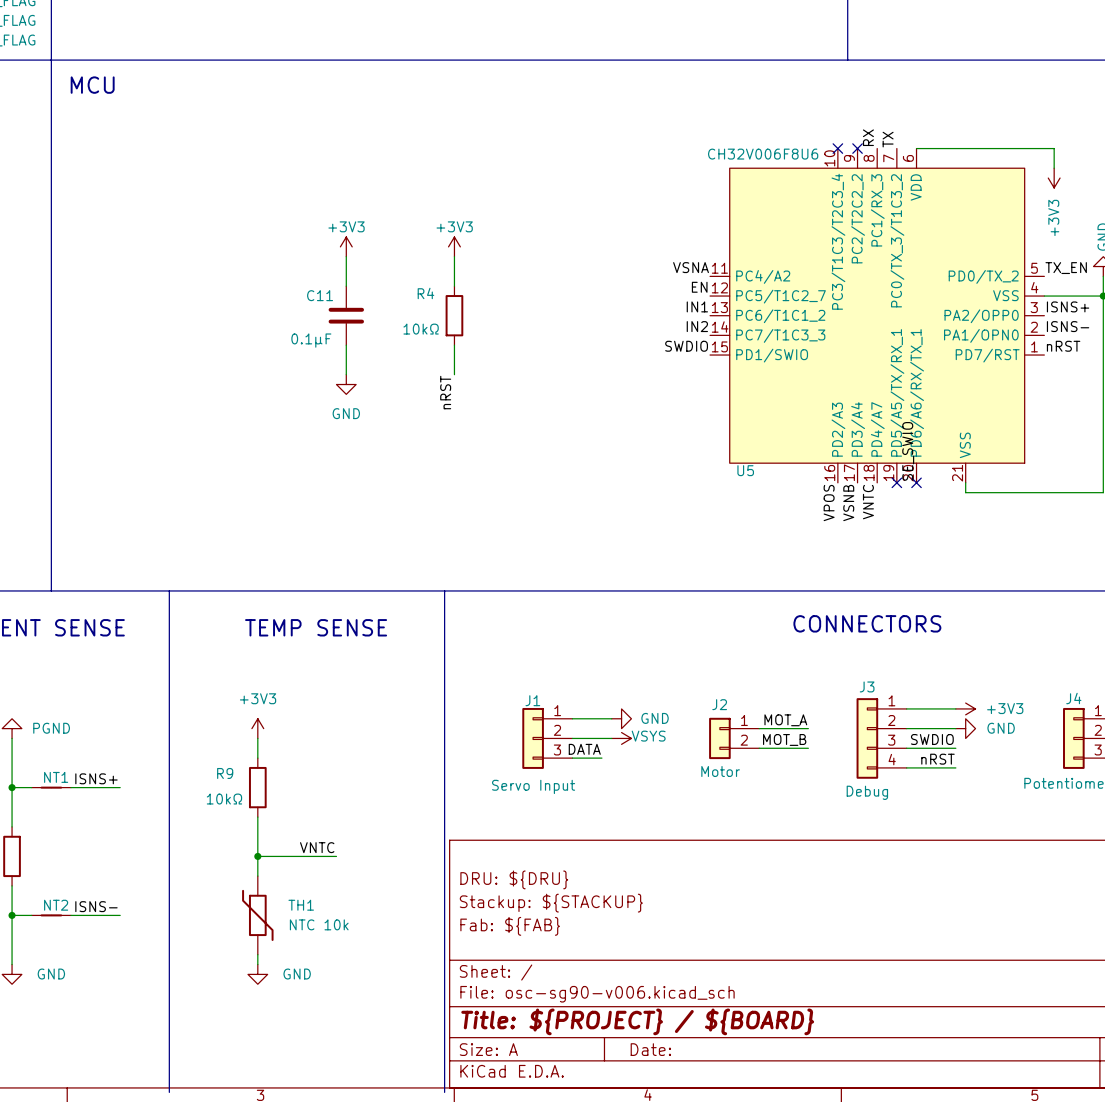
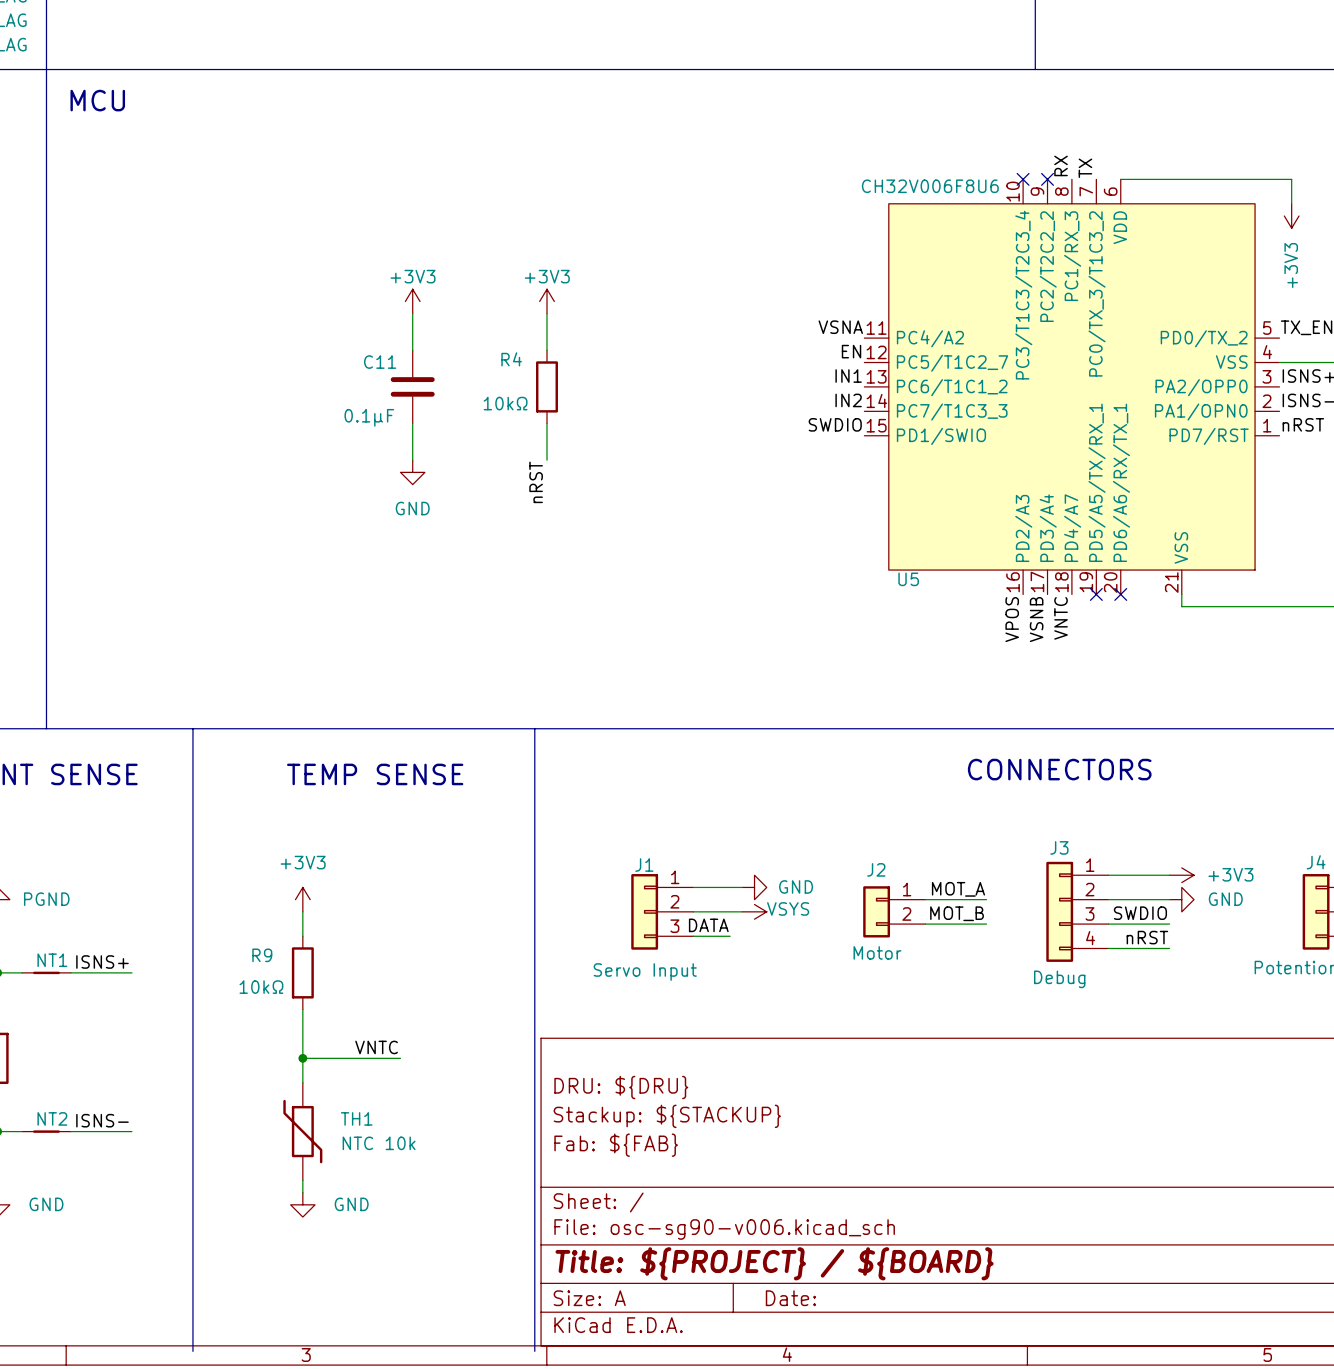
label: SE_SWIO (908, 451) -> none

